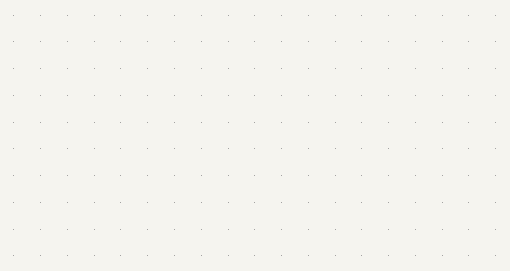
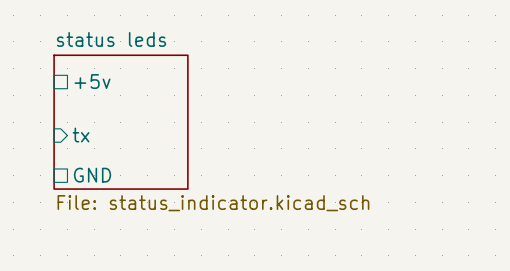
sheet pin: none -> +5v (92, 81)
sheet status leds: none -> File: status_indicator.kicad_sch (120, 122)
sheet pin: none -> tx (81, 135)
sheet pin: none -> GND (92, 175)

